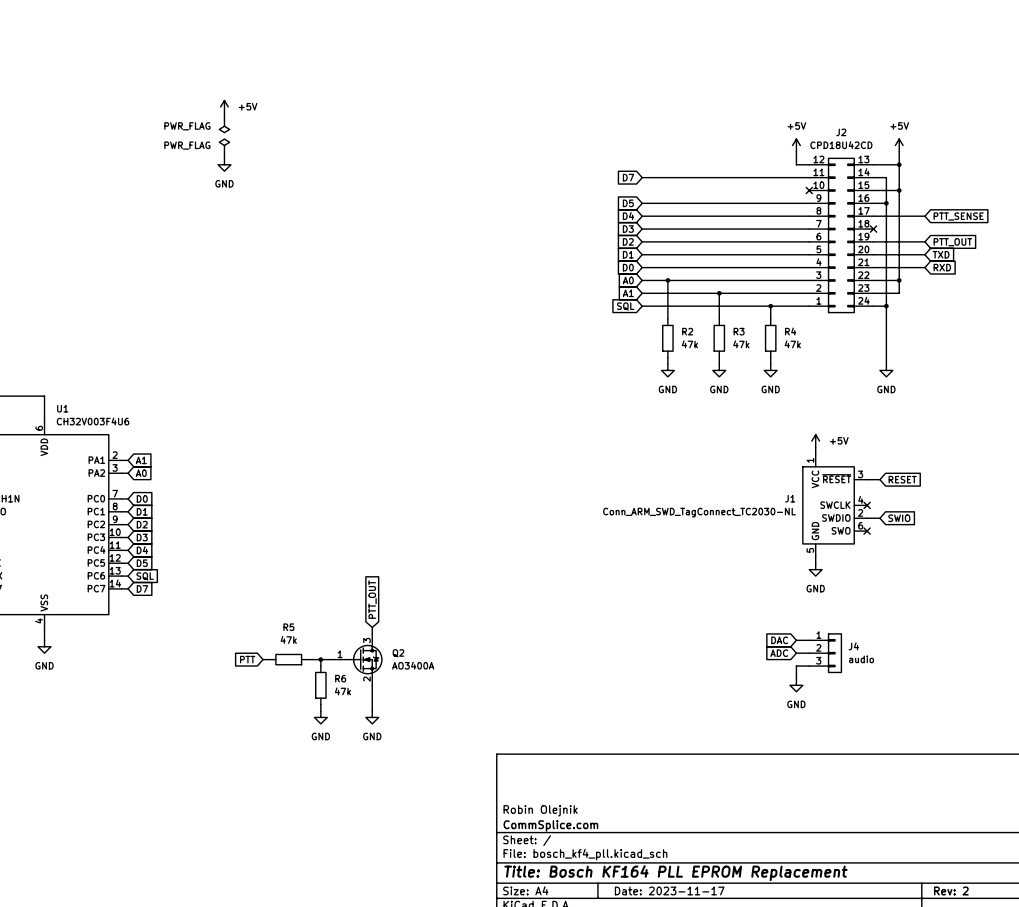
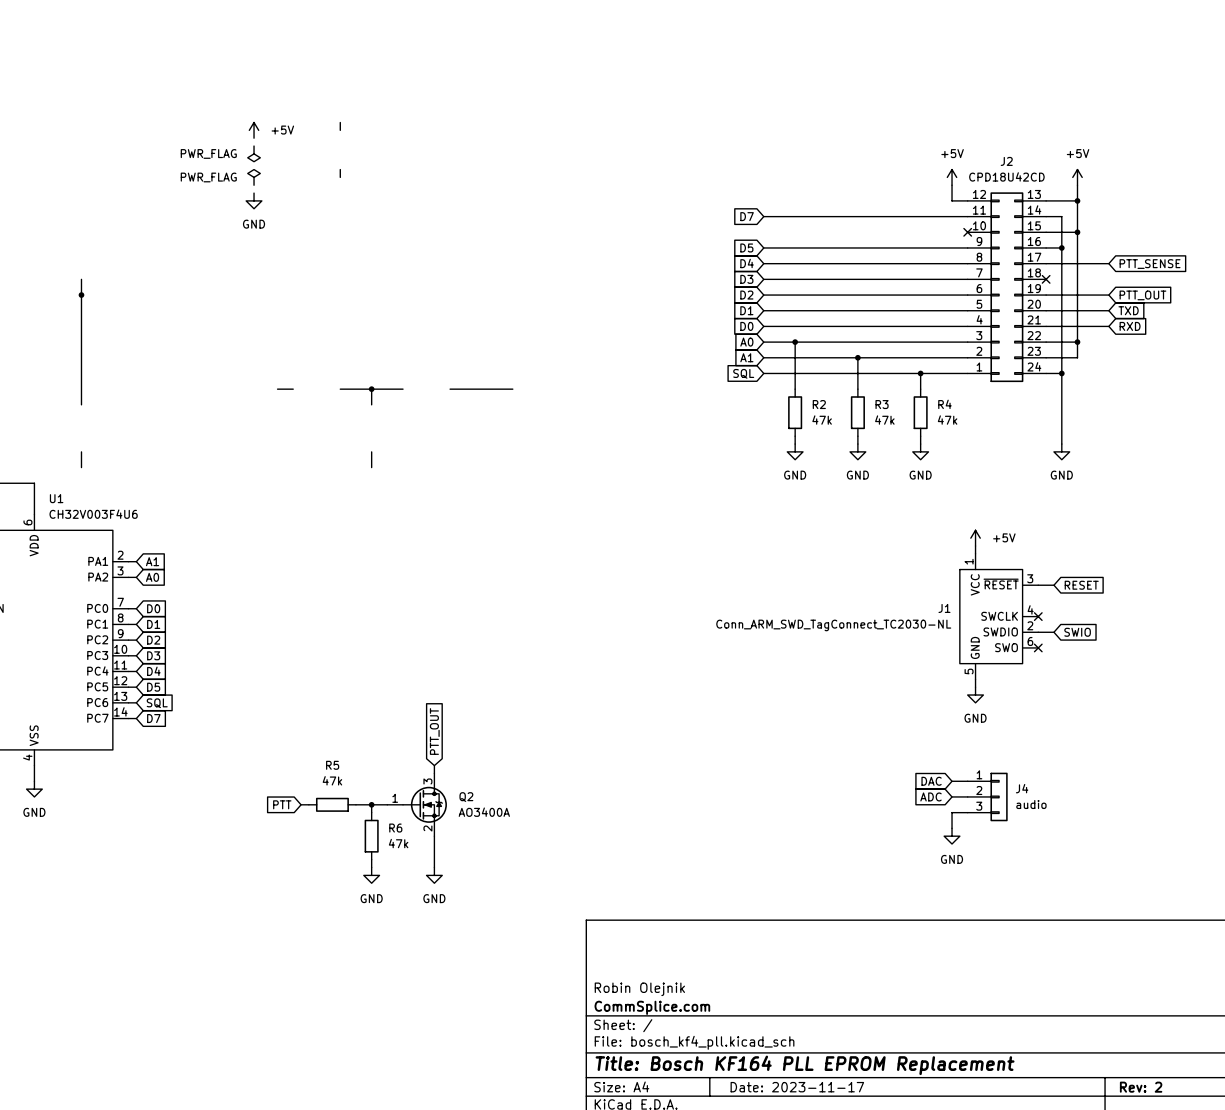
wire: (224, 113) (224, 119) -> (340, 122) (340, 130)
wire: (224, 151) (224, 158) -> (340, 169) (340, 177)
wire: none -> (81, 279) (81, 404)
junction: none -> (81, 295)
wire: none -> (277, 389) (293, 389)
wire: none -> (340, 389) (403, 389)
wire: none -> (371, 389) (371, 404)
junction: none -> (371, 389)
wire: none -> (450, 389) (512, 389)
wire: none -> (81, 451) (81, 467)
wire: none -> (371, 451) (371, 467)

